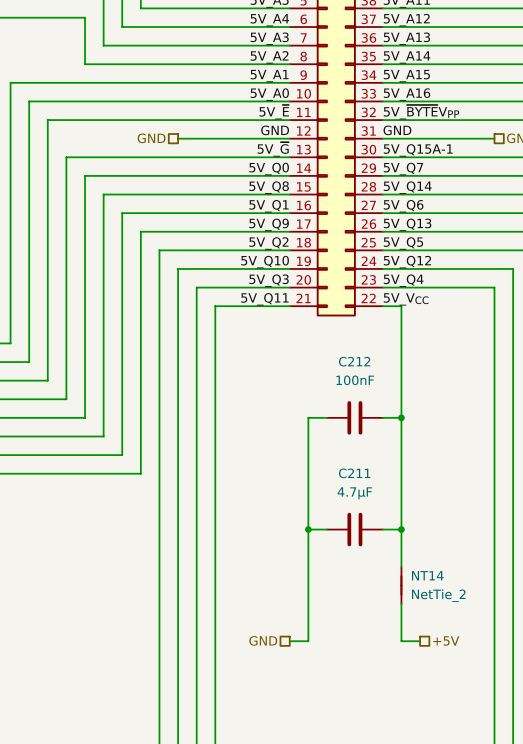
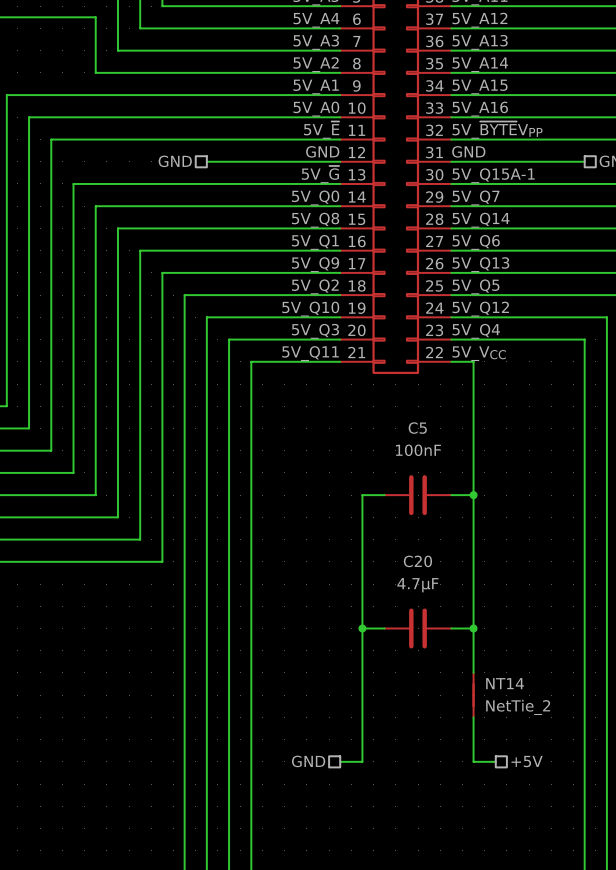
C212 name: C212 (354, 361) -> C5 (417, 428)
C211 name: C211 (354, 473) -> C20 (417, 561)

